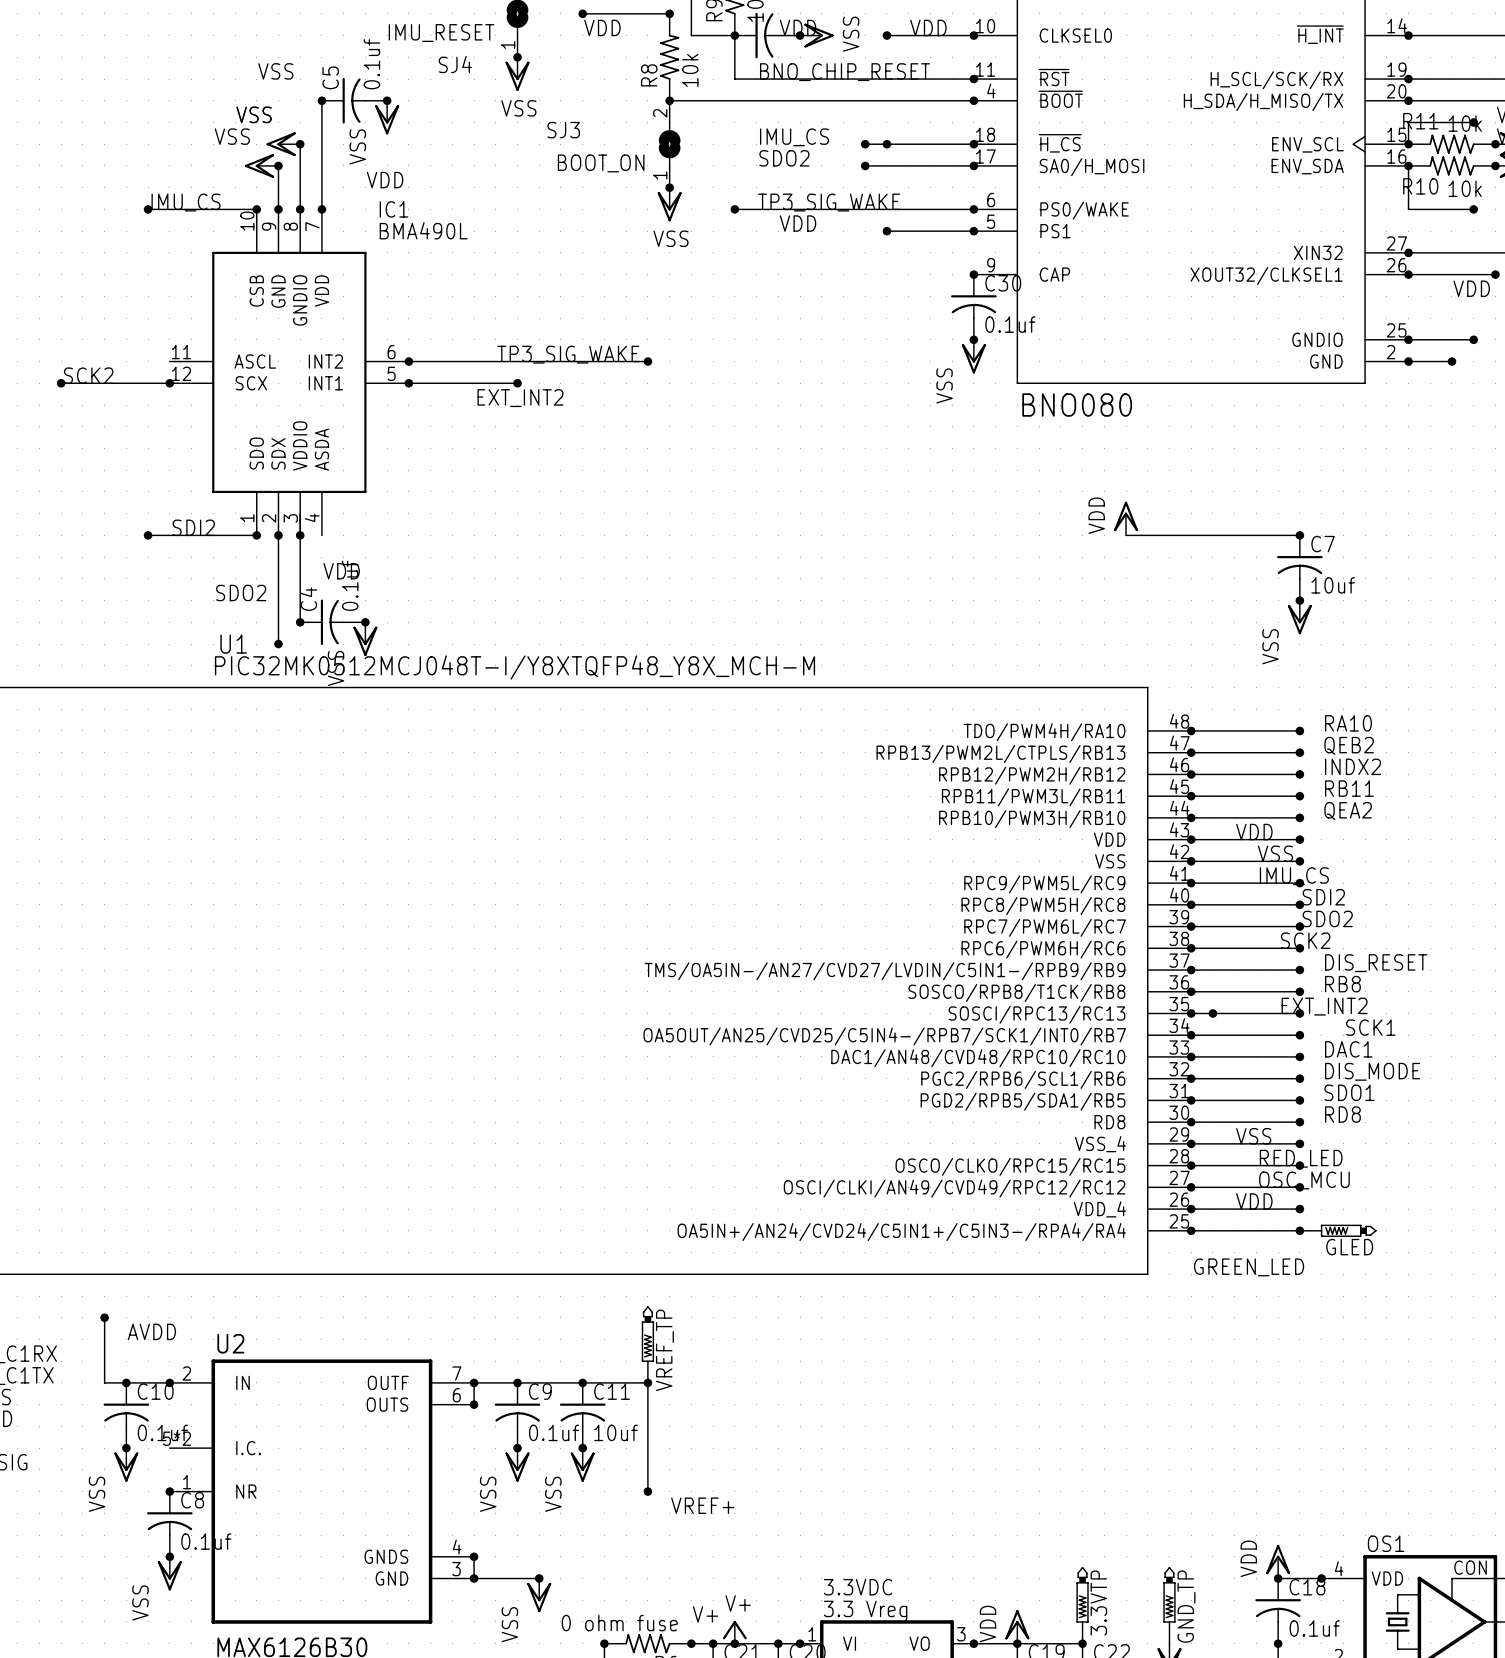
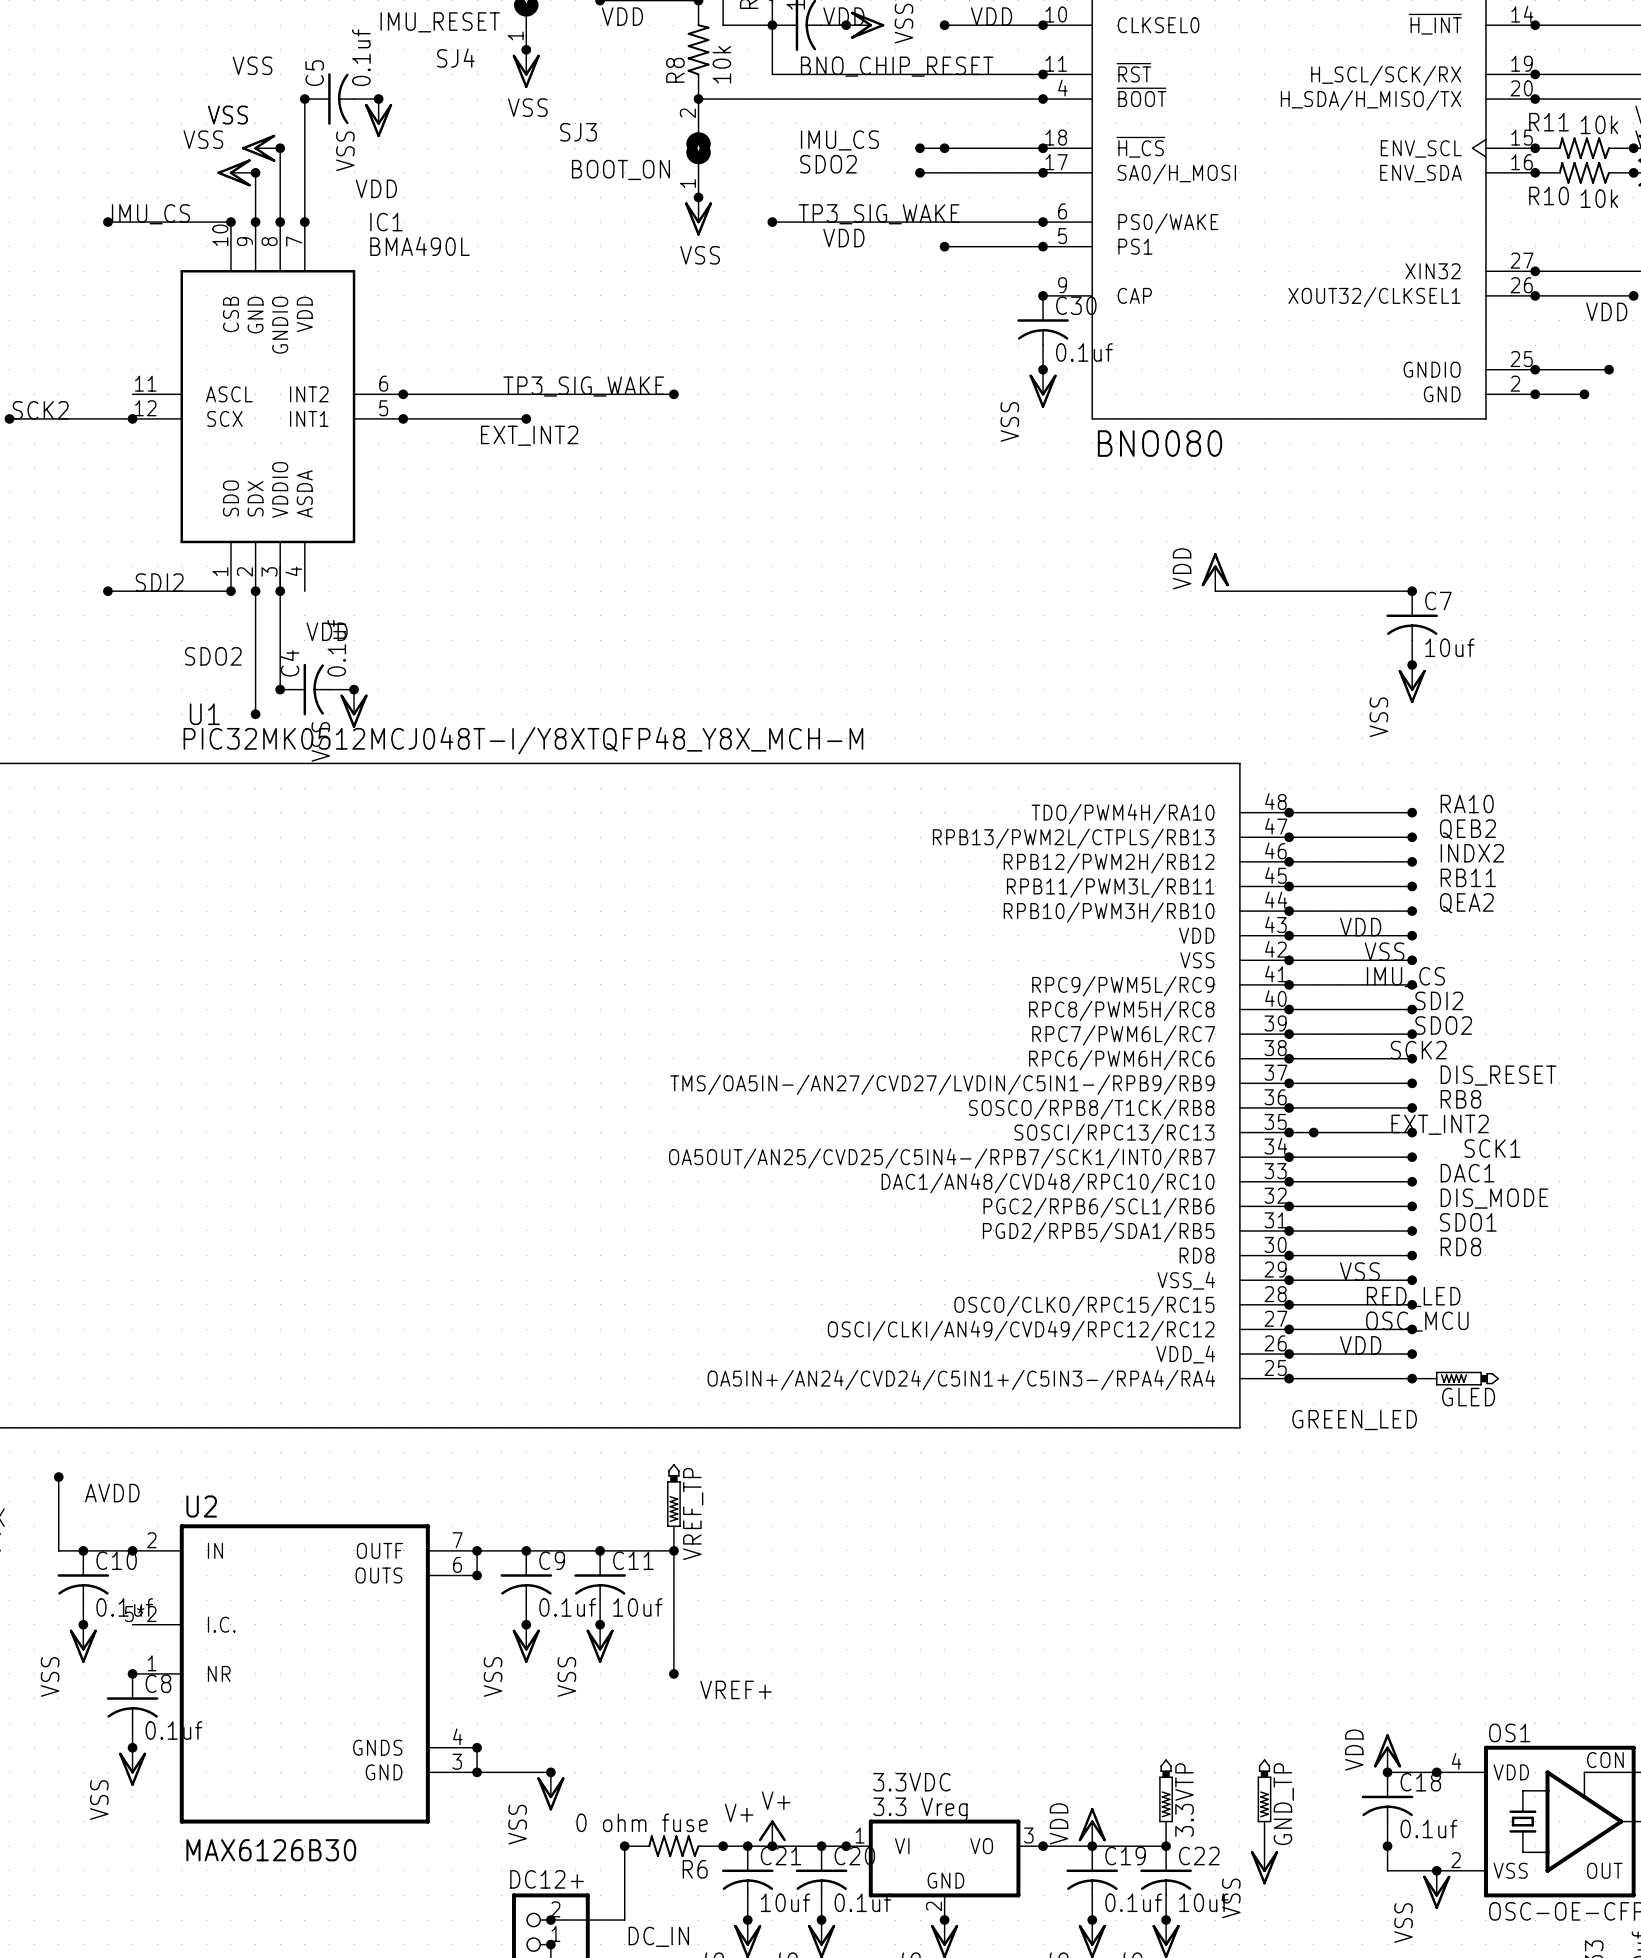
wire: (1473, 122) (1408, 122) (1408, 144) -> none
junction: (1473, 122) -> none
wire: (1408, 165) (1408, 209) (1473, 209) -> none
junction: (1473, 209) -> none

